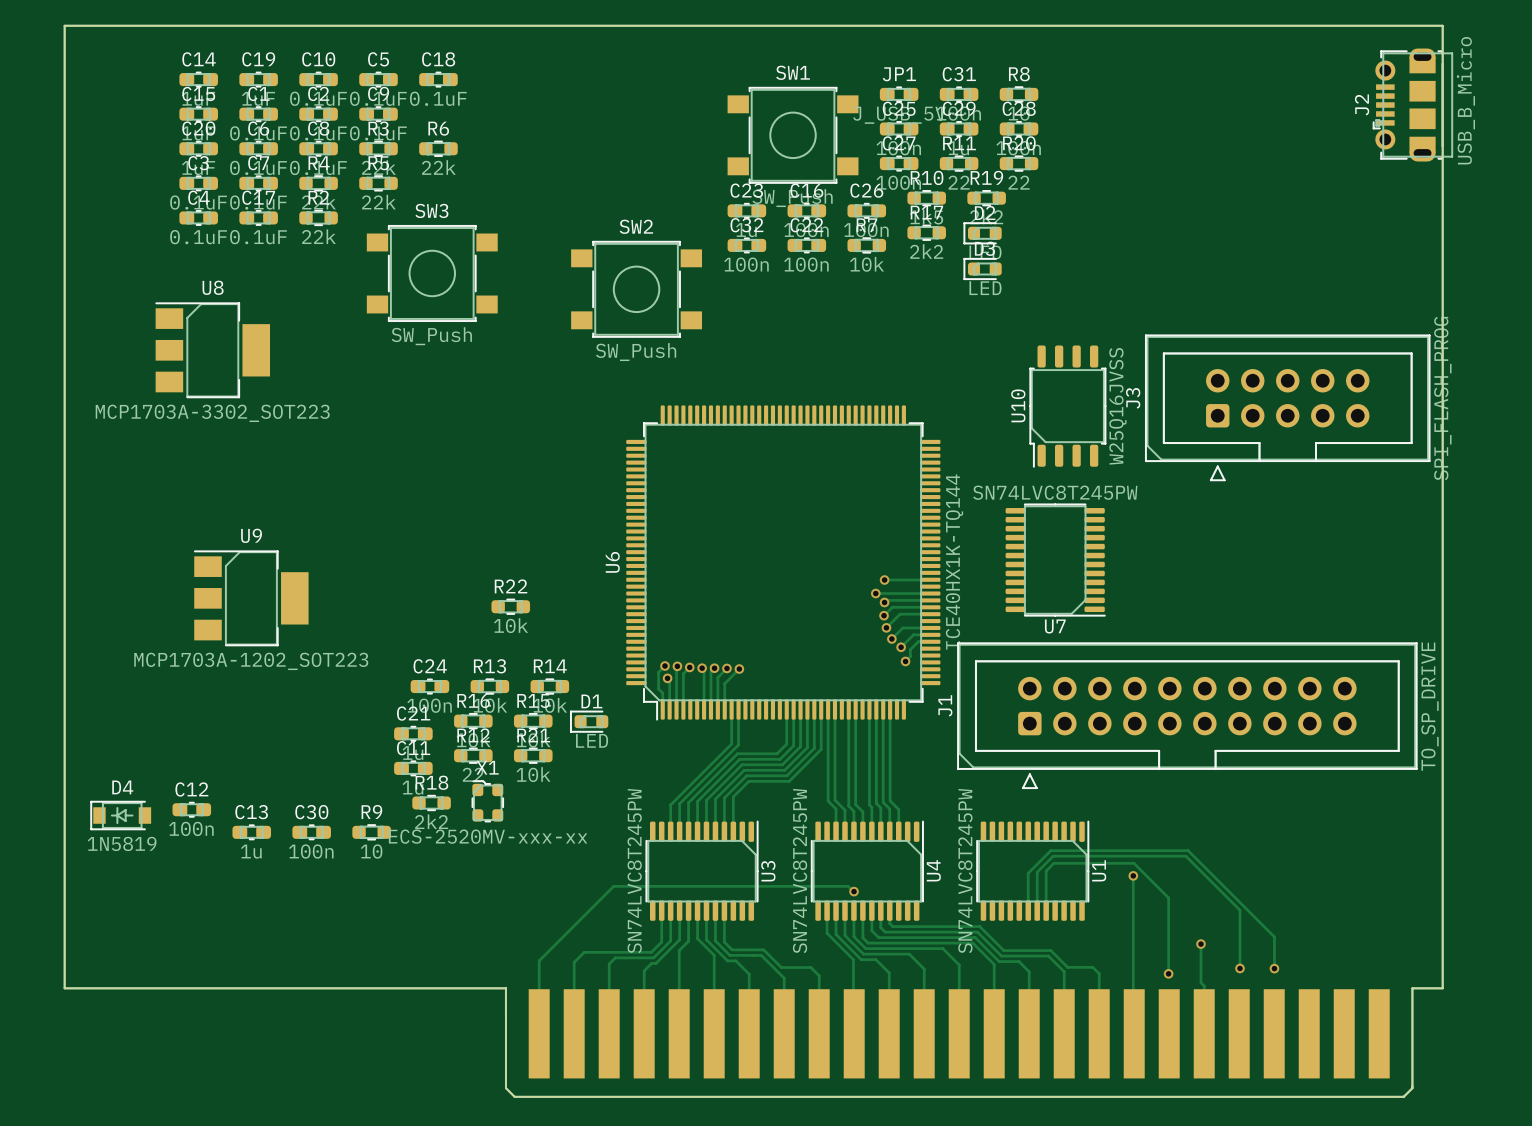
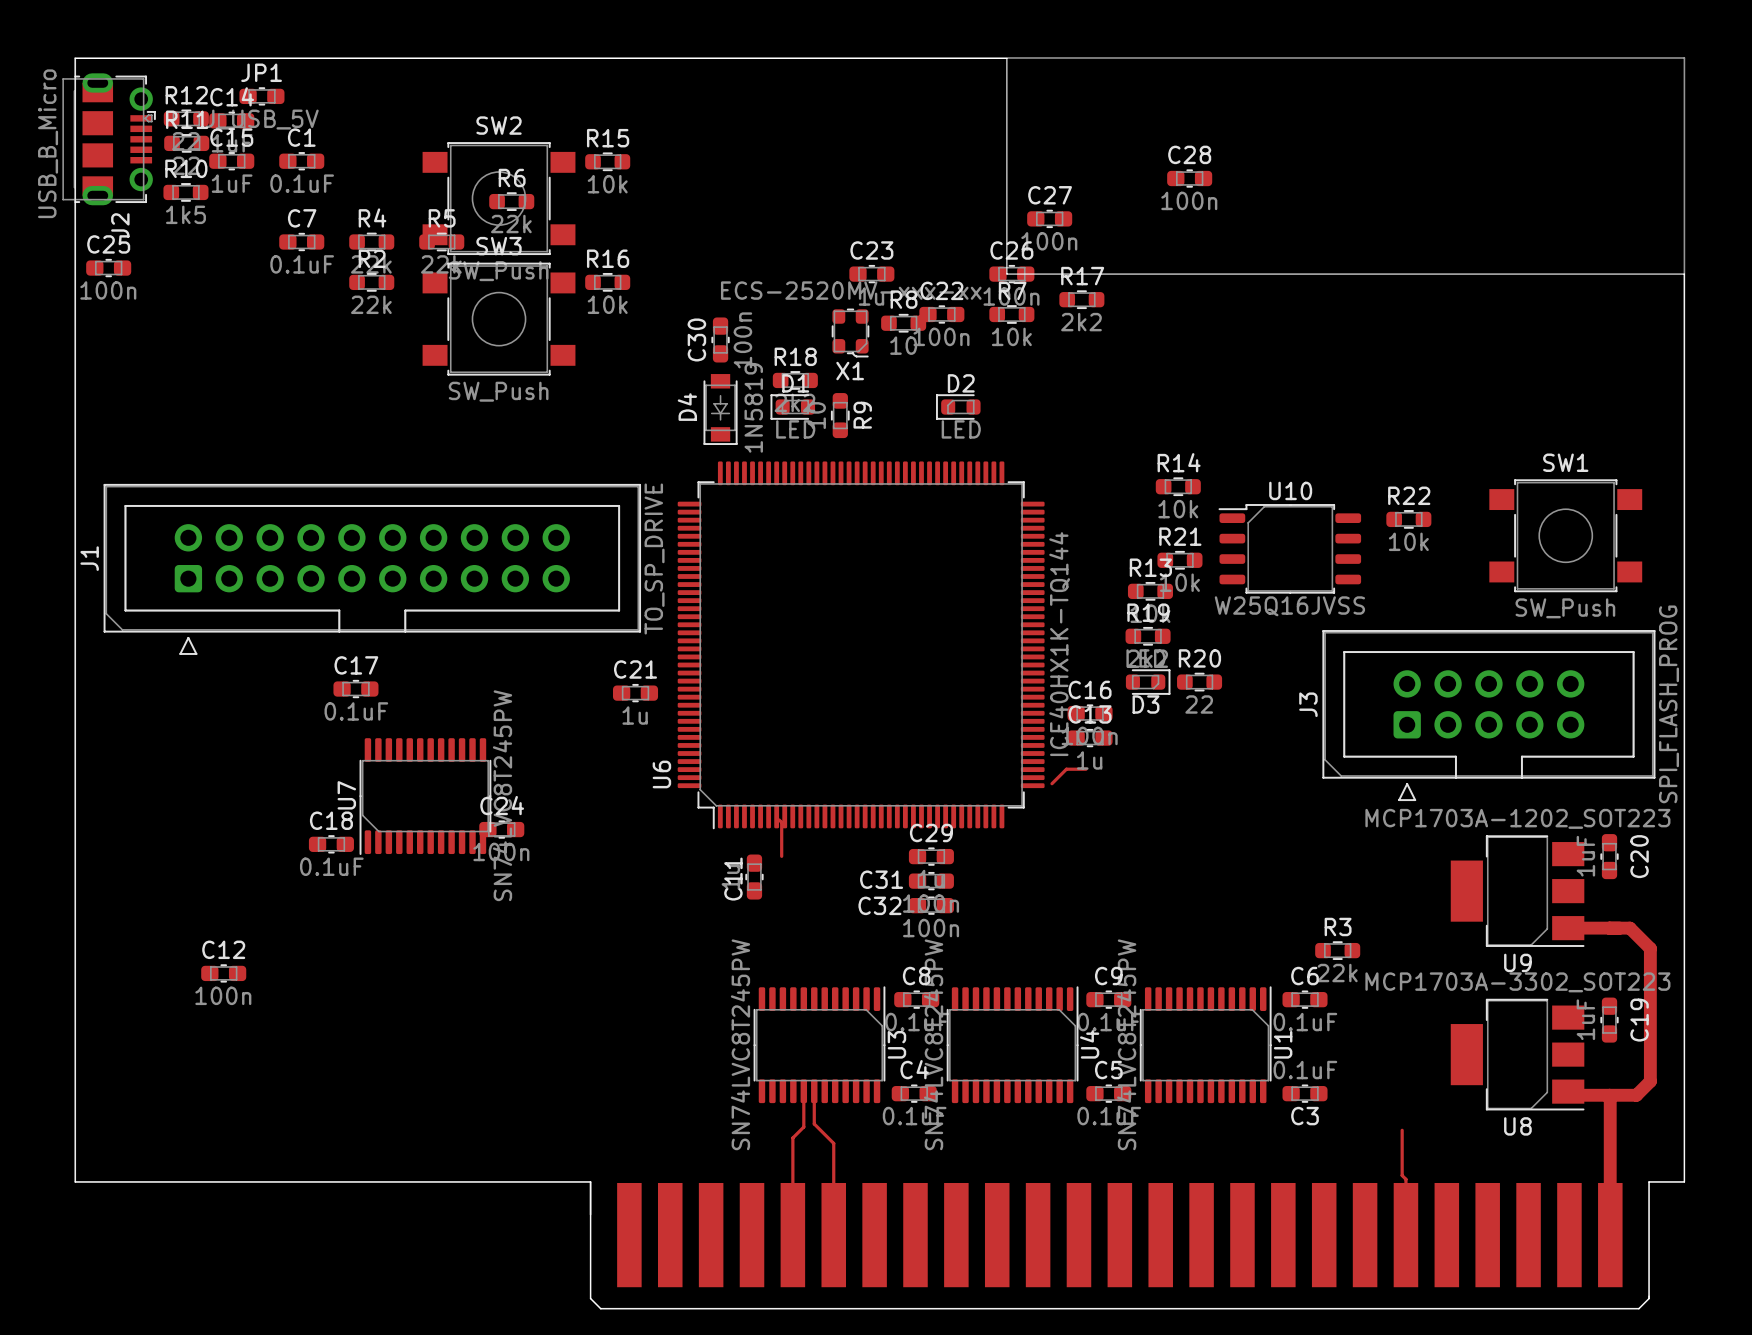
C31 name position: C31 (959, 74) -> C31 (881, 879)
C19 rotation: 0° (258, 79) -> 90° clockwise (1609, 1020)
C19 position: (258, 79) -> (1609, 1020)
C10: 0.1uF (318, 79) -> none
C5 position: (378, 79) -> (1108, 1093)
C18 position: (438, 79) -> (331, 844)
JP1 position: (899, 94) -> (261, 96)
C31 position: (959, 94) -> (931, 881)
R8 position: (1019, 94) -> (903, 323)
J2 name position: J2 (1362, 104) -> J2 (120, 225)
J2 rotation: 0° (1412, 105) -> 180° (109, 139)
J2 position: (1412, 105) -> (109, 139)
C2: 0.1uF (318, 114) -> none
C9 position: (378, 114) -> (1108, 999)
C25 position: (899, 128) -> (108, 268)
C29 position: (959, 128) -> (931, 856)
SW1 position: (793, 135) -> (1565, 535)
C20 rotation: 0° (198, 148) -> 90° clockwise (1609, 856)
C20 position: (198, 148) -> (1609, 856)
C6 position: (258, 148) -> (1305, 999)
C8 position: (318, 148) -> (916, 999)
R3 position: (378, 148) -> (1337, 950)
C3 name position: C3 (198, 163) -> C3 (1305, 1116)
R11 position: (959, 163) -> (186, 143)
R20 position: (1019, 163) -> (1199, 682)
C3 position: (198, 183) -> (1305, 1093)
R10 position: (926, 198) -> (185, 192)
R19 position: (986, 198) -> (1148, 636)
C3 value position: 0.1uF (198, 202) -> 0.1uF (1305, 1070)
C16 position: (806, 210) -> (1090, 713)
C4 position: (198, 217) -> (914, 1093)
C17 position: (258, 217) -> (355, 689)
C32 name position: C32 (746, 225) -> C32 (879, 905)
D2 position: (982, 233) -> (958, 407)
C32 position: (746, 245) -> (931, 905)
D3 rotation: 0° (982, 269) -> 180° (1148, 682)
D3 position: (982, 269) -> (1148, 682)
SW3 position: (432, 273) -> (499, 319)
SW2 position: (636, 289) -> (499, 198)
U8 rotation: 0° (212, 350) -> 180° (1517, 1054)
U8 position: (212, 350) -> (1517, 1054)
U10 rotation: 0° (1067, 406) -> 90° clockwise (1289, 548)
J3 position: (1287, 407) -> (1488, 715)
U7 rotation: 0° (1055, 560) -> 90° clockwise (425, 796)
U7 position: (1055, 560) -> (425, 796)
U6 name position: U6 (612, 562) -> U6 (661, 774)
U6 position: (783, 562) -> (861, 645)
track: (930, 579) (884, 580) -> none
via: (884, 580) -> none
track: (875, 593) (930, 593) -> none
via: (875, 593) -> none
U9 rotation: 0° (251, 598) -> 180° (1517, 891)
U9 position: (251, 598) -> (1517, 891)
track: (930, 600) (886, 600) (884, 602) -> none
via: (884, 602) -> none
R22 position: (510, 606) -> (1408, 519)
track: (930, 607) (892, 607) (884, 615) -> none
track: (930, 614) (900, 614) (886, 627) -> none
via: (884, 615) -> none
via: (886, 627) -> none
track: (930, 627) (902, 627) (891, 639) -> none
via: (891, 639) -> none
track: (930, 641) (918, 641) (910, 649) (910, 656) (905, 661) -> none
via: (901, 647) -> none
via: (905, 661) -> none
track: (665, 665) (658, 672) (658, 689) (662, 693) (662, 709) -> none
via: (665, 665) -> none
track: (677, 666) (676, 709) -> none
via: (677, 666) -> none
track: (689, 667) (683, 673) (683, 709) -> none
via: (689, 667) -> none
track: (702, 668) (704, 670) (704, 709) -> none
via: (702, 668) -> none
track: (714, 668) (710, 671) (710, 709) -> none
via: (714, 668) -> none
track: (726, 668) (717, 677) (717, 709) -> none
via: (726, 668) -> none
track: (739, 669) (724, 683) (724, 709) -> none
via: (739, 669) -> none
via: (667, 678) -> none
R13 position: (489, 686) -> (1150, 591)
R14 position: (549, 686) -> (1178, 486)
track: (731, 709) (731, 744) (670, 804) (670, 831) -> none
track: (738, 709) (738, 744) (679, 803) (679, 831) -> none
track: (786, 709) (786, 744) (777, 753) (737, 753) (688, 802) (688, 831) -> none
track: (793, 709) (793, 745) (780, 759) (739, 759) (697, 801) (697, 831) -> none
track: (800, 709) (800, 746) (782, 764) (742, 764) (706, 800) (706, 831) -> none
track: (807, 709) (807, 747) (784, 770) (744, 770) (715, 799) (715, 831) -> none
track: (814, 709) (814, 748) (786, 775) (746, 775) (724, 798) (724, 831) -> none
track: (821, 709) (821, 749) (789, 781) (748, 781) (733, 796) (733, 831) -> none
track: (828, 709) (828, 801) (836, 808) (836, 831) -> none
track: (834, 709) (834, 800) (844, 810) (844, 831) -> none
track: (848, 709) (848, 806) (853, 811) (853, 831) -> none
track: (855, 709) (855, 804) (862, 811) (862, 831) -> none
track: (869, 709) (869, 804) (871, 807) (871, 831) -> none
track: (876, 709) (876, 803) (880, 807) (880, 831) -> none
track: (883, 709) (883, 802) (889, 809) (889, 831) -> none
track: (890, 709) (890, 800) (898, 809) (898, 831) -> none
J1 position: (1187, 715) -> (372, 569)
R16 position: (473, 721) -> (607, 282)
R15 position: (533, 721) -> (607, 161)
D1 position: (589, 721) -> (792, 407)
C21 position: (413, 733) -> (635, 693)
R12 position: (473, 755) -> (186, 118)
R21 position: (533, 755) -> (1179, 560)
C11 rotation: 0° (413, 768) -> 90° clockwise (754, 877)
C11 position: (413, 768) -> (754, 877)
track: none -> (1568, 928) (1629, 928) (1650, 948) (1650, 1081) (1636, 1095) (1571, 1095) (1568, 1091)
X1 rotation: 0° (487, 801) -> 180° (850, 333)
X1 position: (487, 801) -> (850, 333)
R18 position: (431, 802) -> (795, 380)
C30 name position: C30 (311, 812) -> C30 (696, 339)
D4 rotation: 0° (120, 815) -> 90° counterclockwise (720, 409)
D4 position: (120, 815) -> (720, 409)
C13 position: (251, 832) -> (1090, 738)
C30 rotation: 0° (311, 832) -> 90° clockwise (720, 339)
C30 position: (311, 832) -> (720, 339)
R9 rotation: 0° (371, 832) -> 90° clockwise (840, 415)
R9 position: (371, 832) -> (840, 415)
C30 value position: 100n (311, 851) -> 100n (742, 340)
track: (1133, 875) (1134, 1033) -> none
via: (1133, 875) -> none
track: (854, 891) (848, 886) (613, 886) (539, 960) (539, 1033) -> none
via: (854, 891) -> none
track: (1028, 900) (1028, 873) (1050, 850) (1188, 850) (1274, 936) (1274, 968) -> none
track: (661, 910) (661, 942) (651, 952) (584, 952) (574, 962) (574, 1033) -> none
track: (670, 910) (670, 940) (653, 957) (615, 957) (609, 964) (609, 1033) -> none
track: (679, 910) (679, 939) (656, 963) (651, 963) (644, 970) (644, 1033) -> none
track: (706, 910) (706, 939) (727, 960) (735, 960) (749, 974) (749, 1033) -> none
track: (715, 910) (715, 940) (729, 955) (761, 955) (784, 978) (784, 1033) -> none
track: (724, 910) (724, 942) (732, 949) (763, 949) (781, 967) (810, 967) (819, 975) (819, 1033) -> none
track: (827, 910) (827, 933) (853, 959) (854, 1033) -> none
track: (836, 910) (836, 934) (861, 959) (875, 959) (889, 972) (889, 1033) -> none
track: (844, 910) (844, 935) (863, 954) (909, 954) (924, 969) (924, 1033) -> none
track: (853, 910) (853, 936) (865, 948) (942, 948) (959, 964) (959, 1033) -> none
track: (862, 910) (862, 937) (868, 943) (972, 943) (994, 964) (994, 1033) -> none
track: (871, 910) (871, 930) (878, 937) (975, 937) (999, 961) (1018, 961) (1029, 971) (1029, 1033) -> none
track: (880, 910) (880, 927) (885, 932) (977, 932) (1001, 956) (1048, 956) (1064, 971) (1064, 1033) -> none
track: (889, 910) (889, 923) (892, 926) (979, 926) (1003, 950) (1050, 950) (1067, 967) (1092, 967) (1099, 973) (1099, 1033) -> none
track: (1037, 910) (1037, 872) (1053, 856) (1185, 856) (1239, 910) (1239, 968) -> none
track: (1046, 910) (1046, 871) (1053, 863) (1134, 863) (1168, 897) (1168, 973) -> none
track: none -> (1609, 1095) (1610, 1235)
via: (1201, 944) -> none
via: (1239, 968) -> none
via: (1274, 968) -> none
via: (1168, 973) -> none
board edge: (64, 988) (64, 25) (1442, 25) (1442, 988) -> (75, 1181) (75, 58) (1006, 58) (1006, 274) (1684, 274) (1684, 1181)

